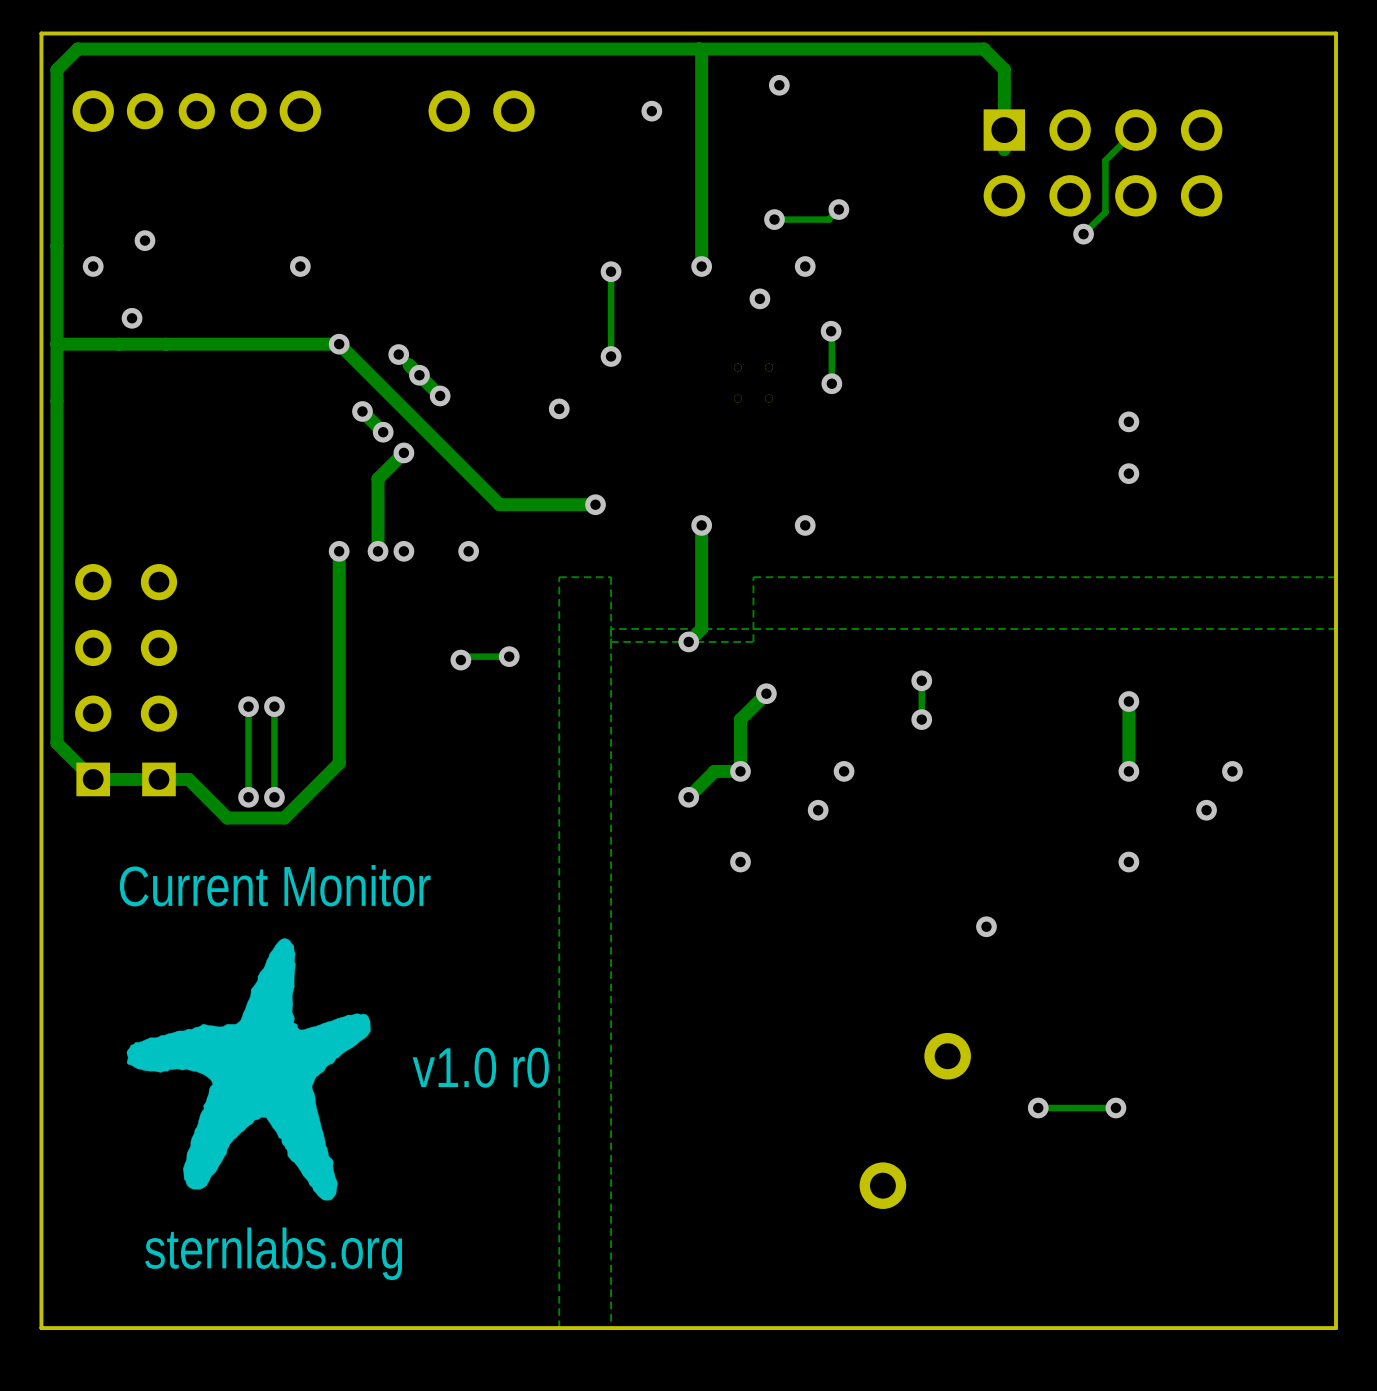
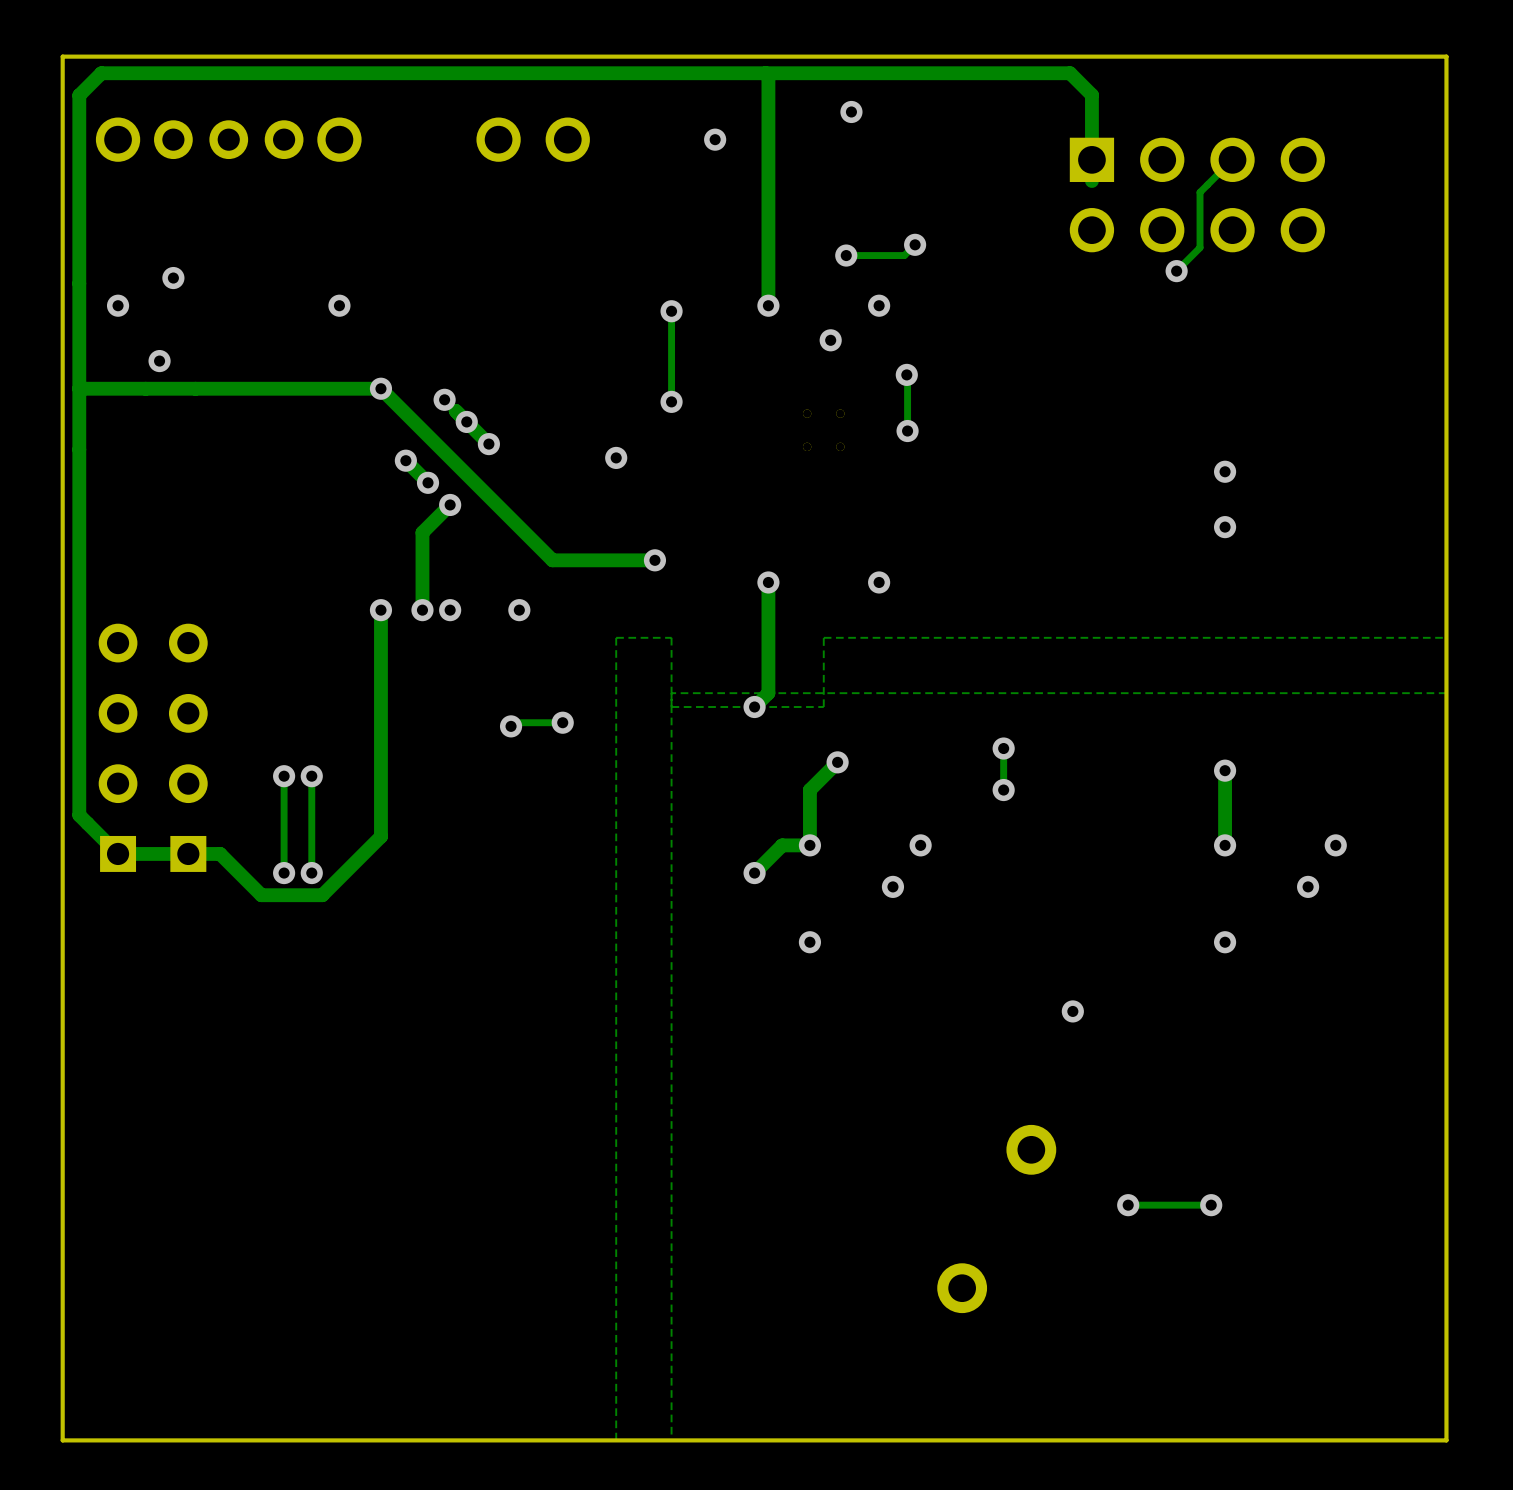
text: Current Monitor (275, 885) -> none
drawing: [126, 938, 371, 1201] -> none
text: v1.0 r0 (480, 1067) -> none
text: sternlabs.org (273, 1253) -> none

